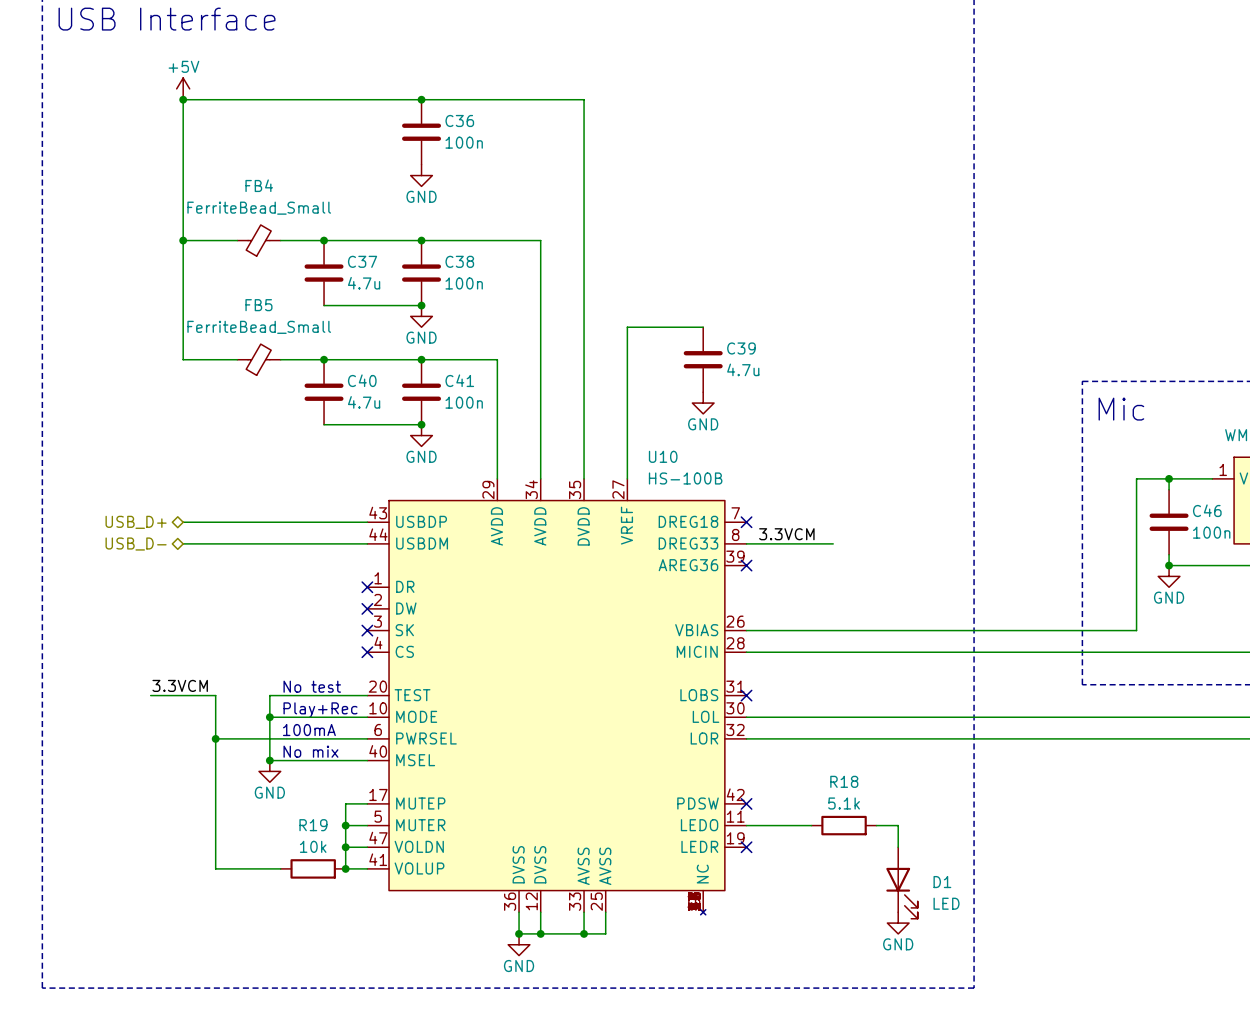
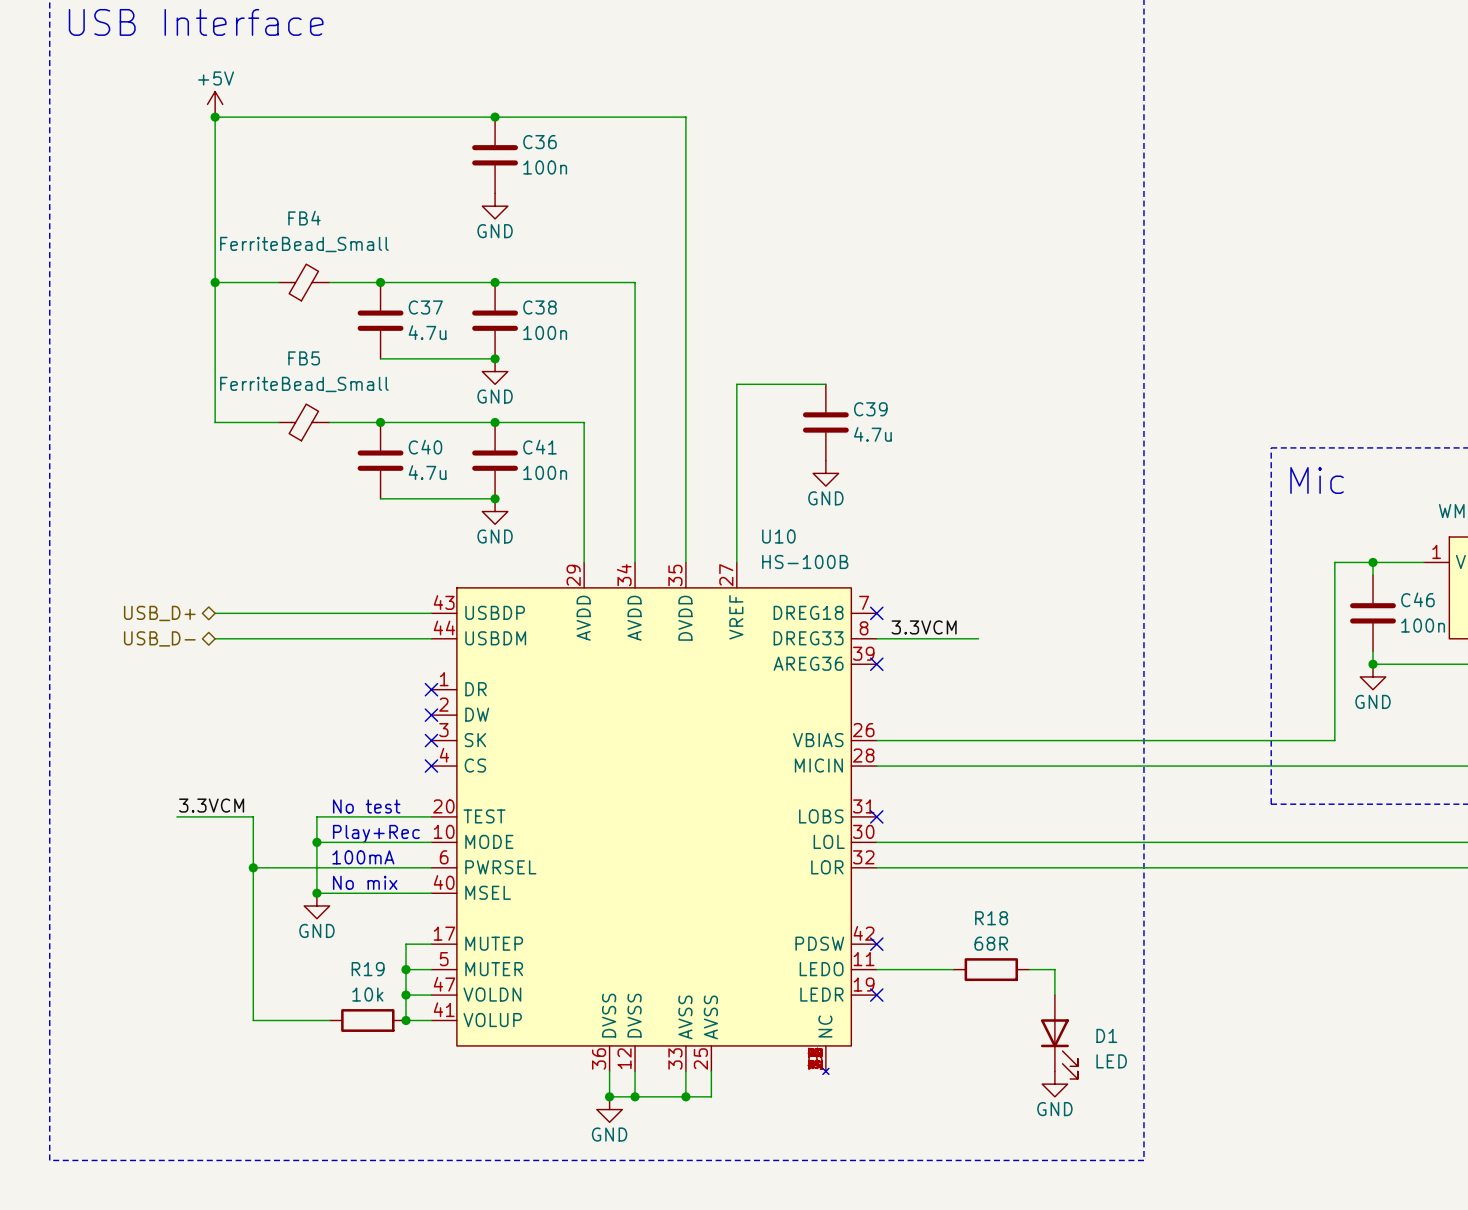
R18 value: 5.1k (844, 803) -> 68R (991, 943)

